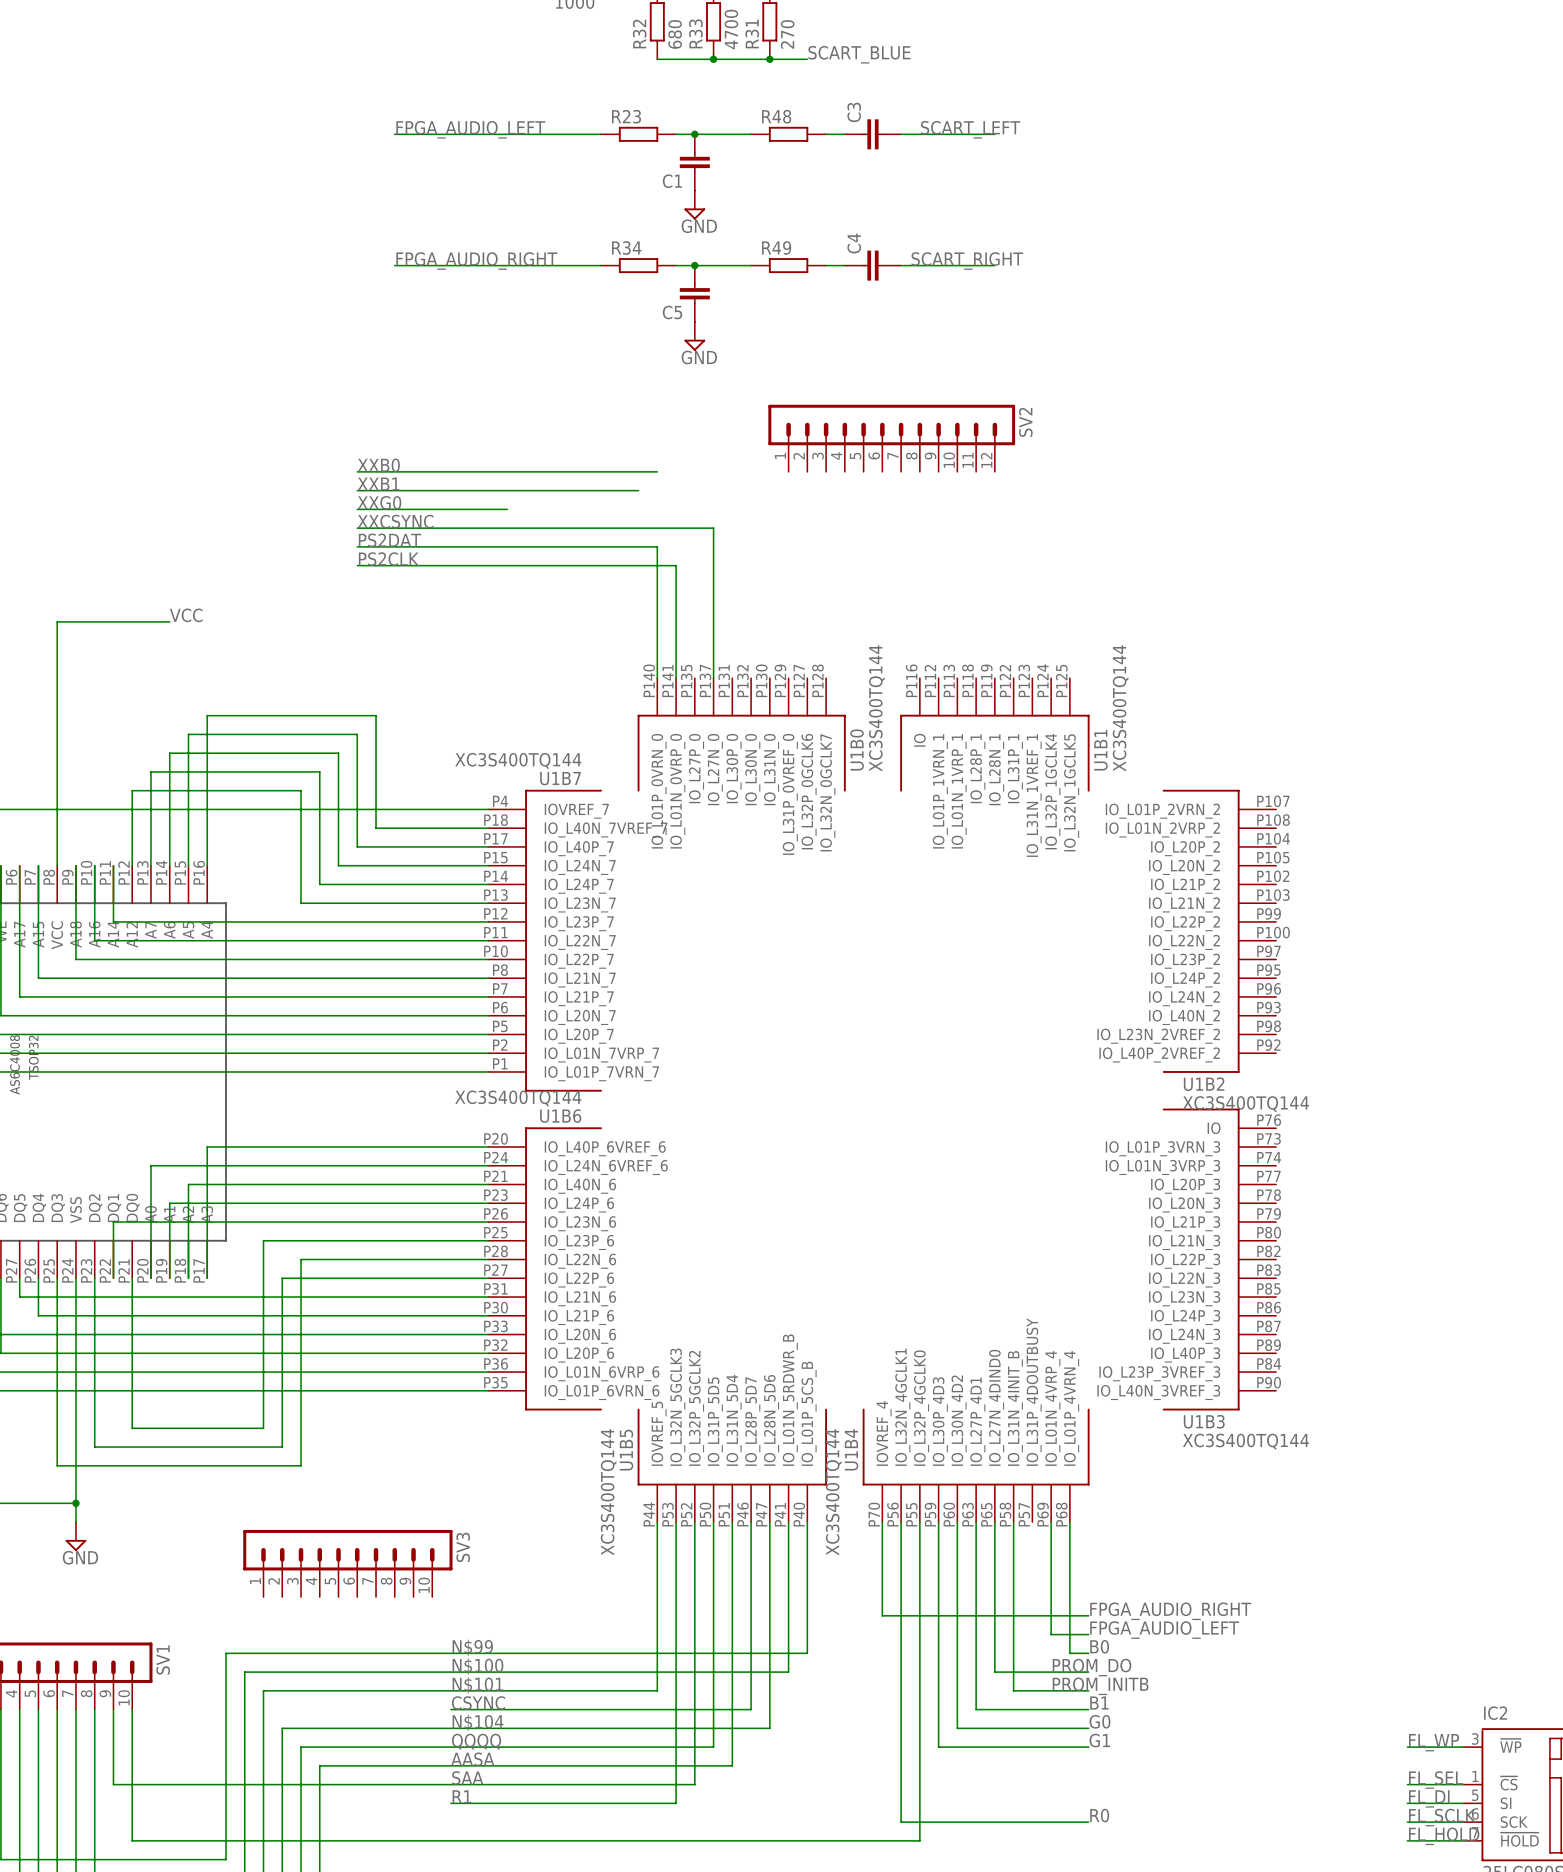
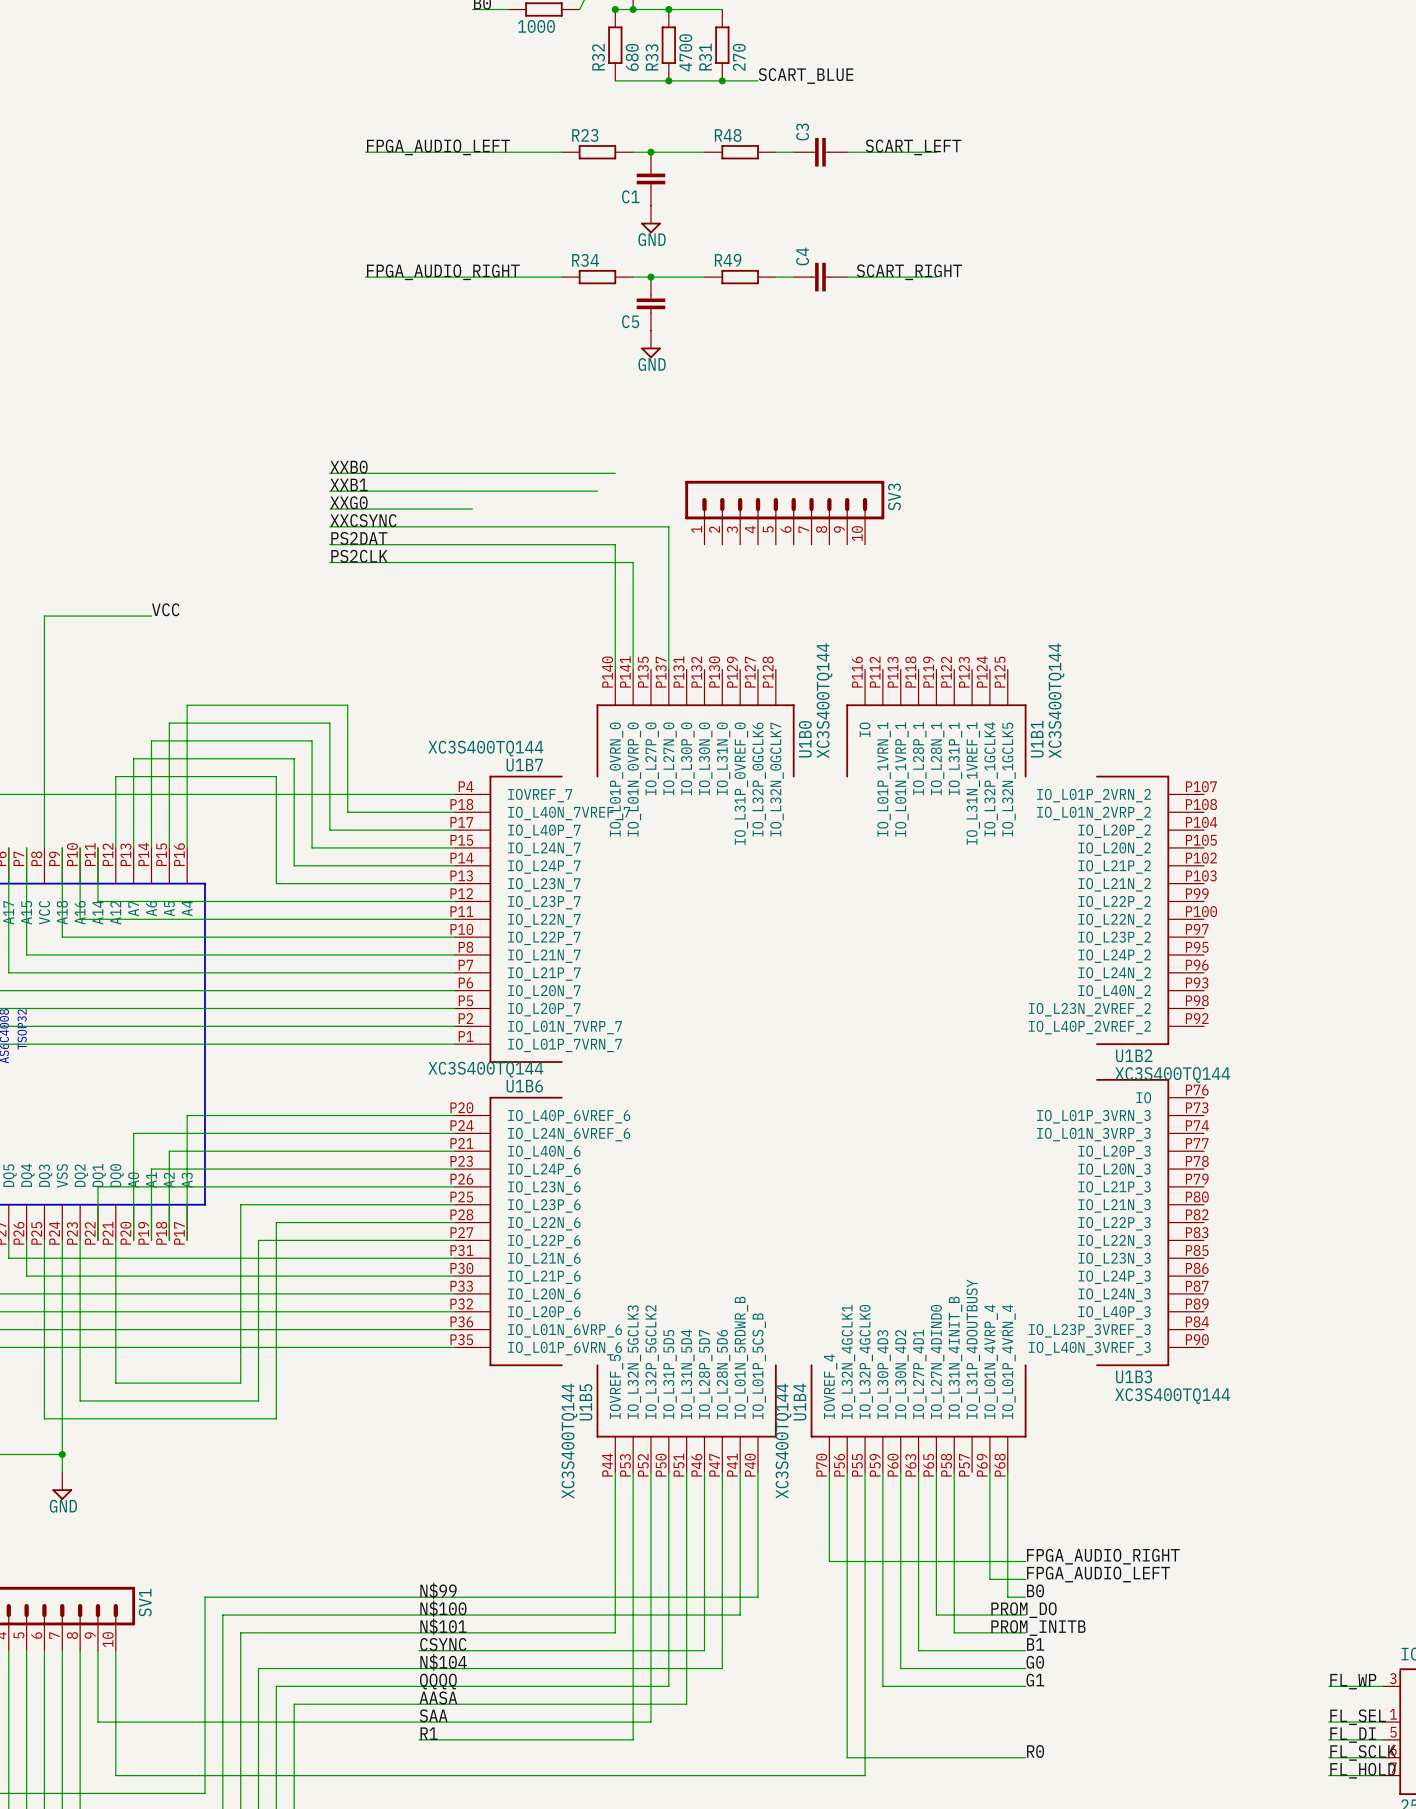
SV2: (891, 438) -> none
SV3 position: (347, 1563) -> (784, 512)

